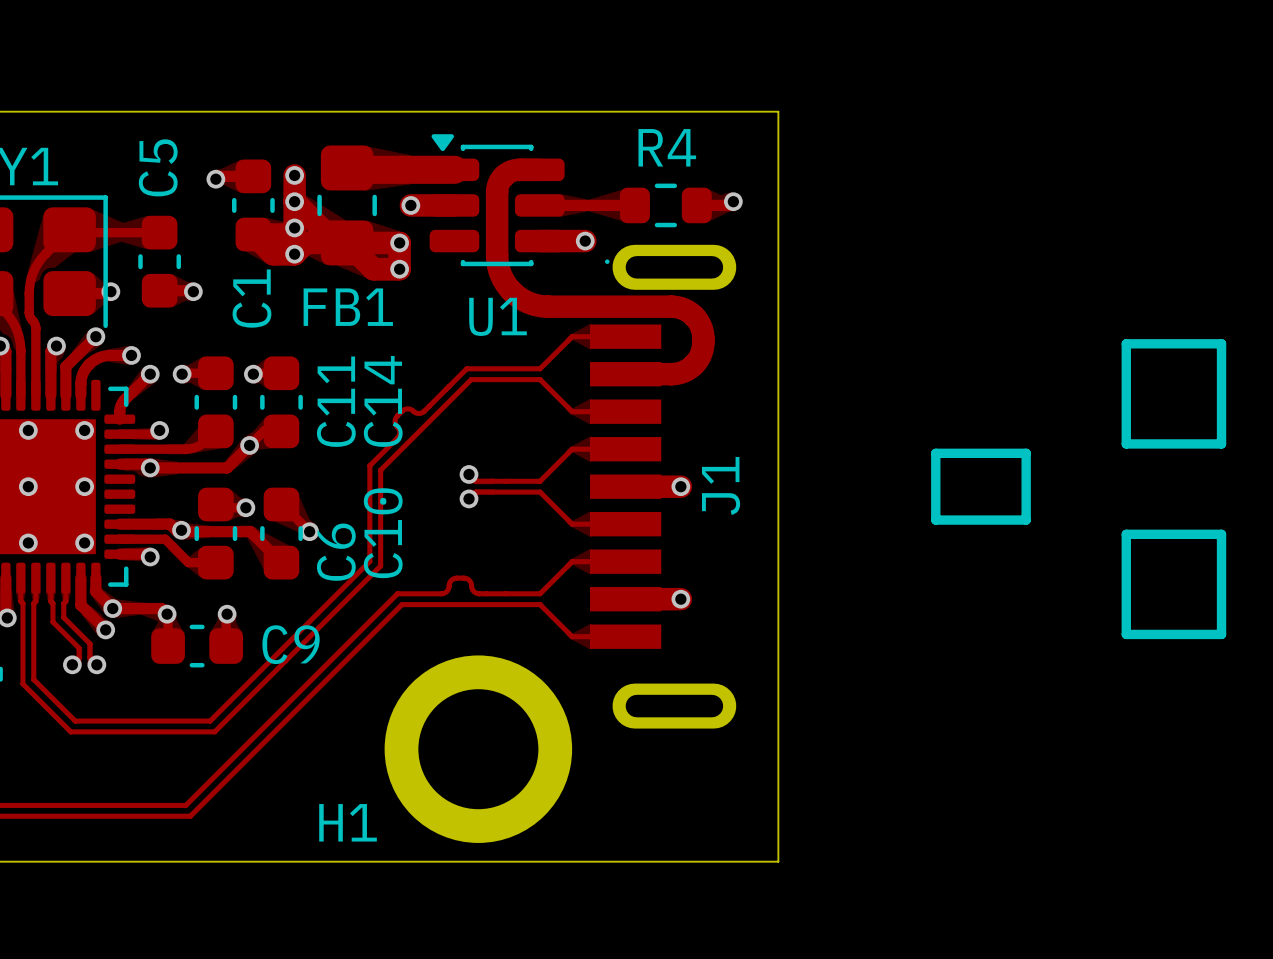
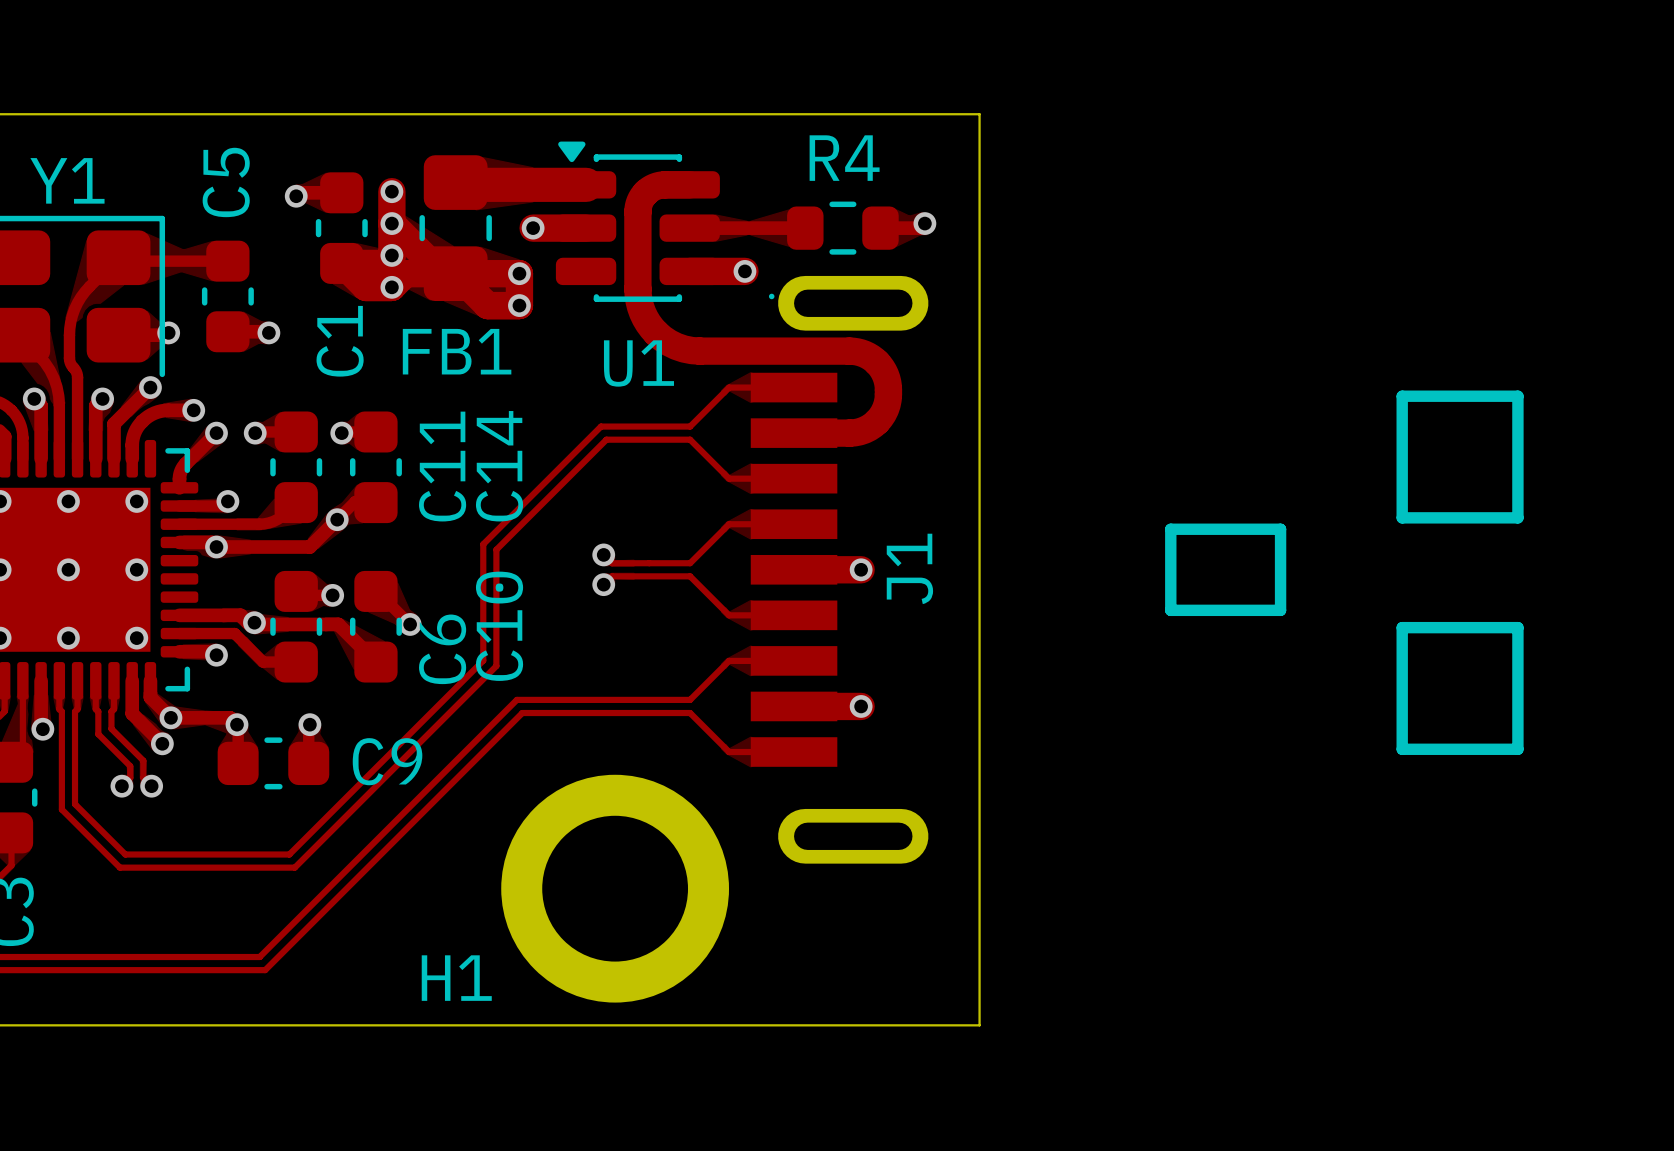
track: (424, 411) (417, 413) (406, 409) (397, 415) (395, 422) (399, 432) (397, 438) -> (549, 478) (516, 510)
track: (441, 593) (446, 591) (450, 581) (456, 578) (468, 579) (473, 590) (479, 593) -> (570, 699) (616, 699)

